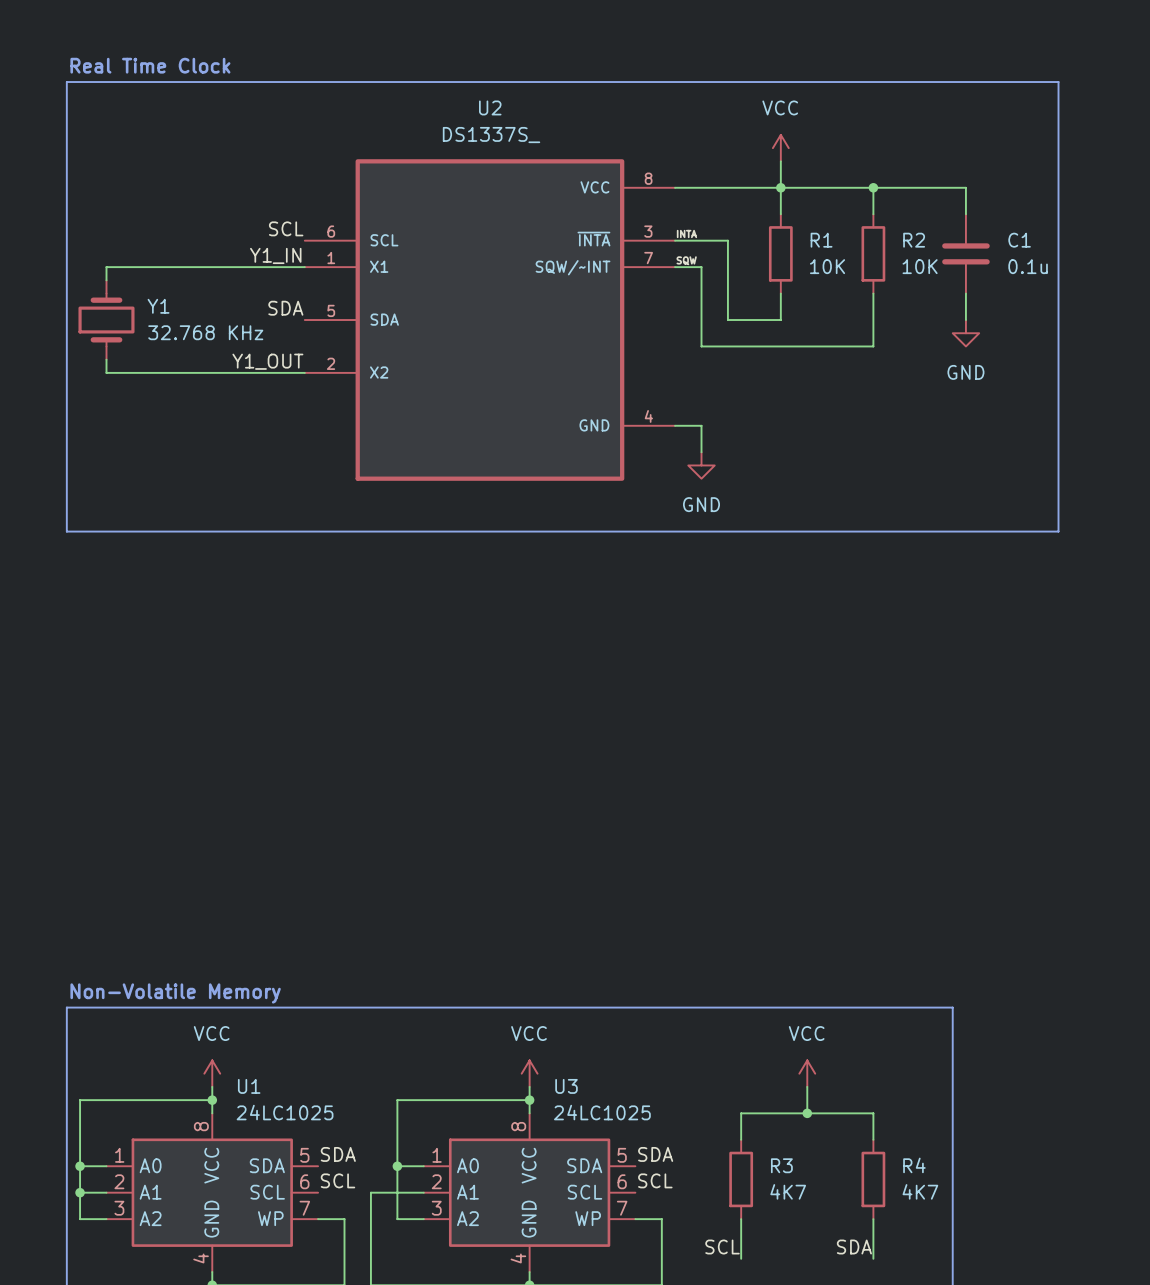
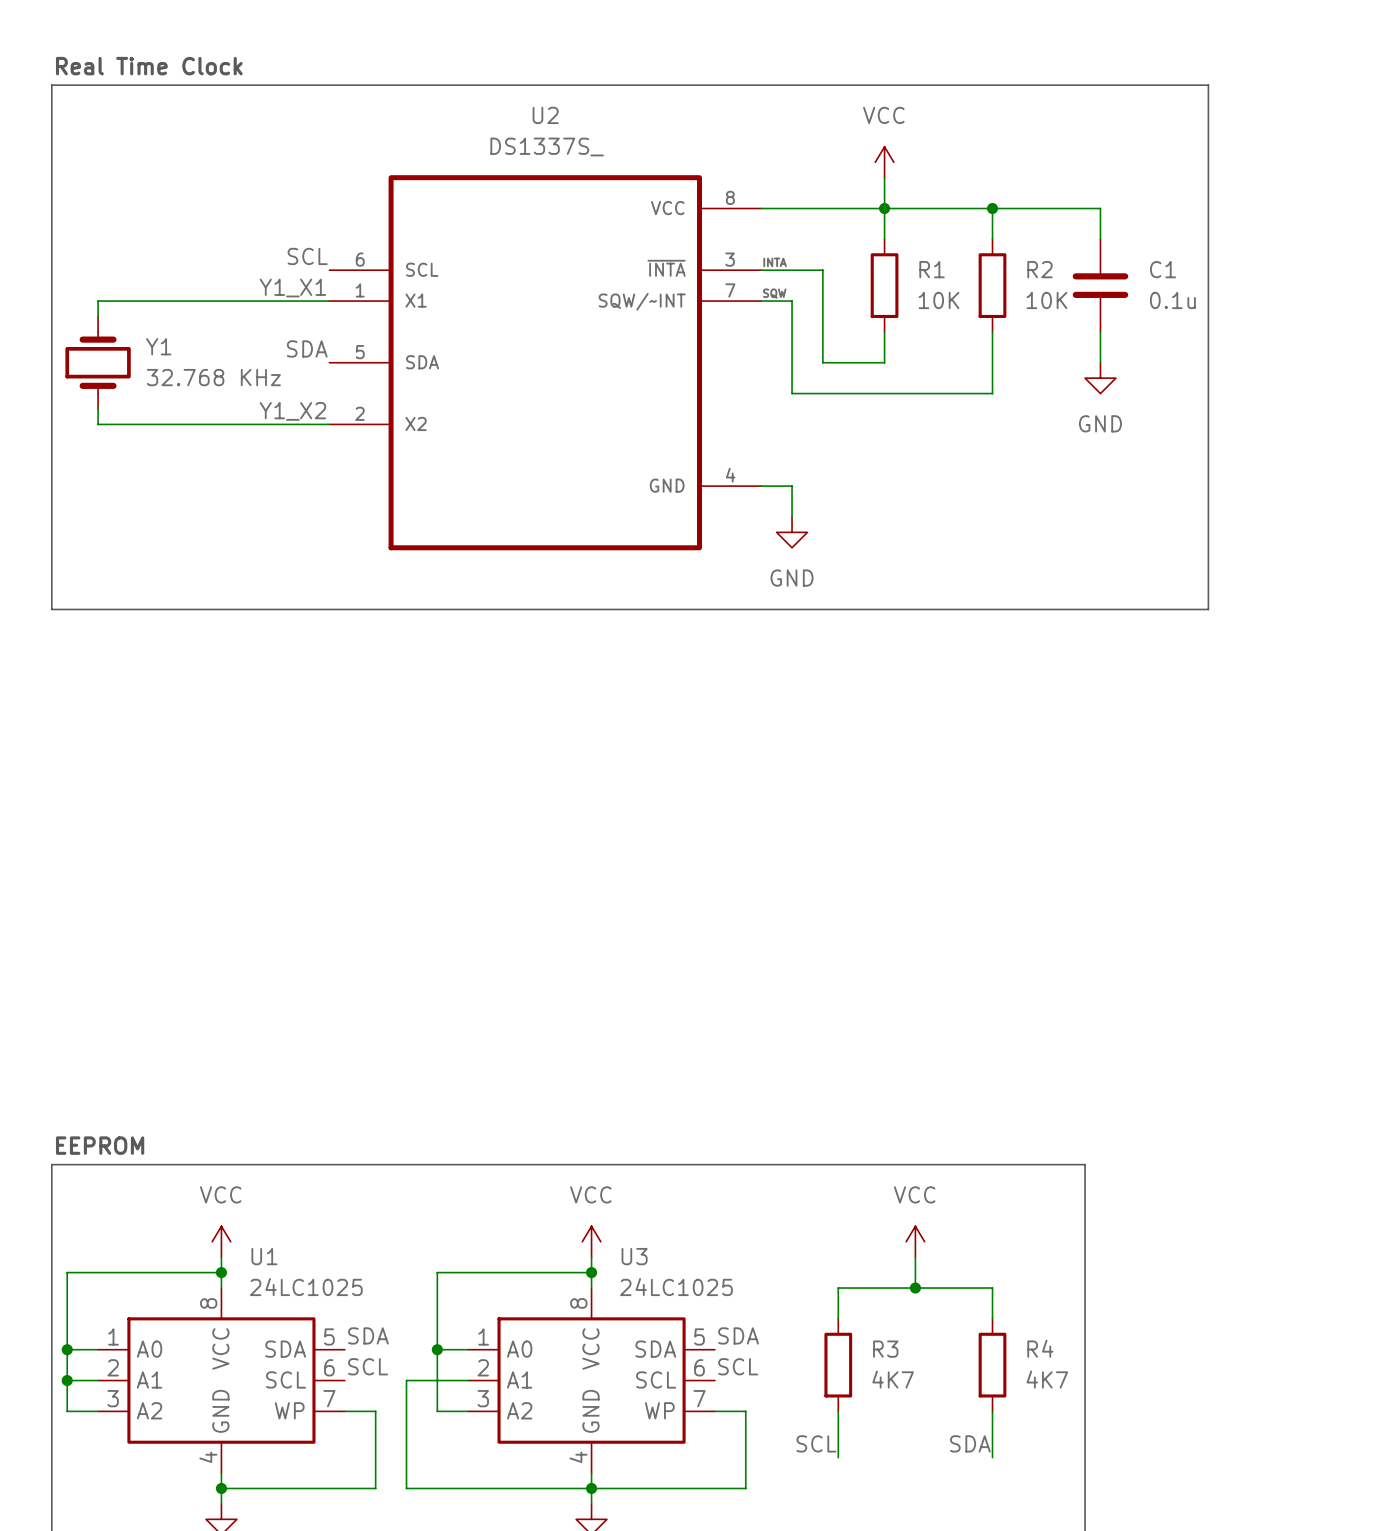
label: Y1_IN (275, 255) -> Y1_X1 (292, 288)
label: Y1_OUT (267, 361) -> Y1_X2 (292, 411)
text: Non-Volatile Memory (175, 993) -> EEPROM (100, 1145)

